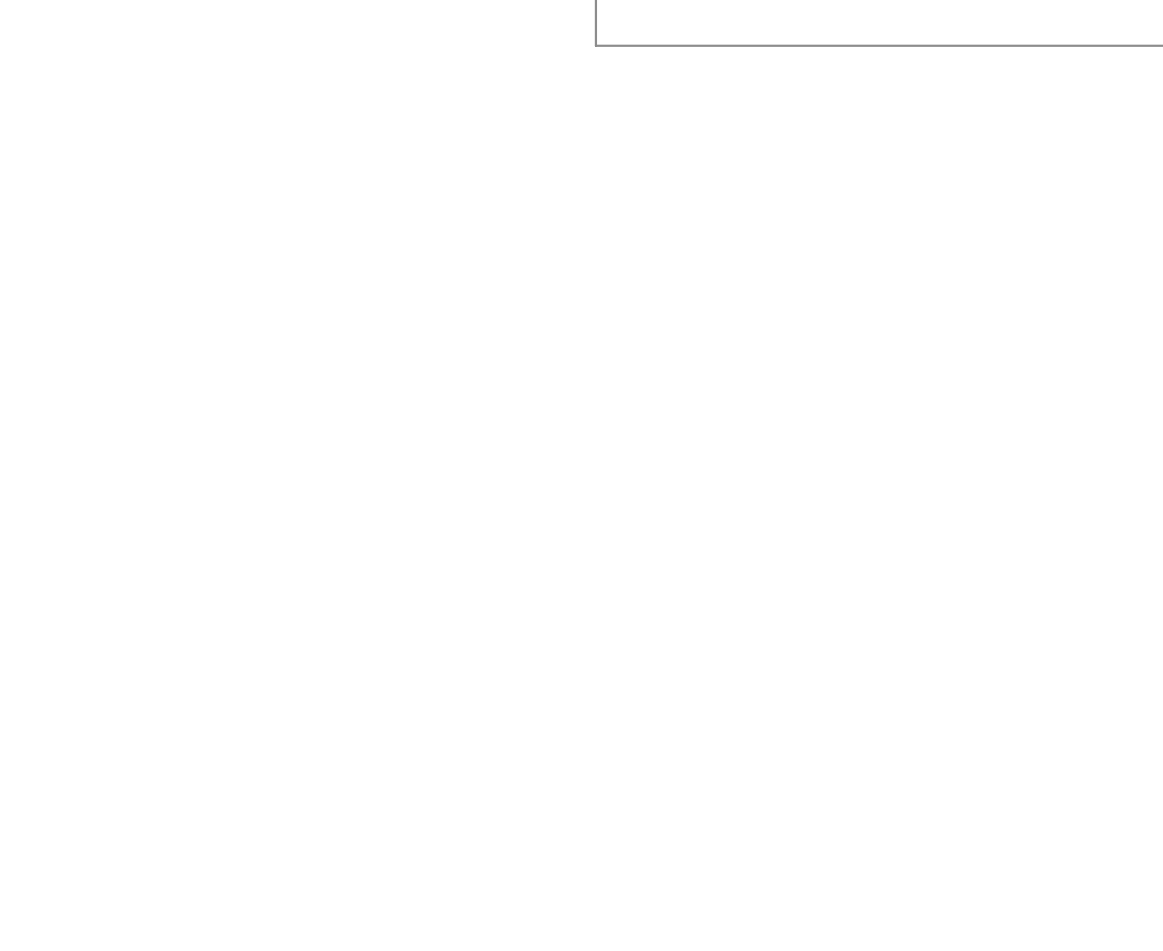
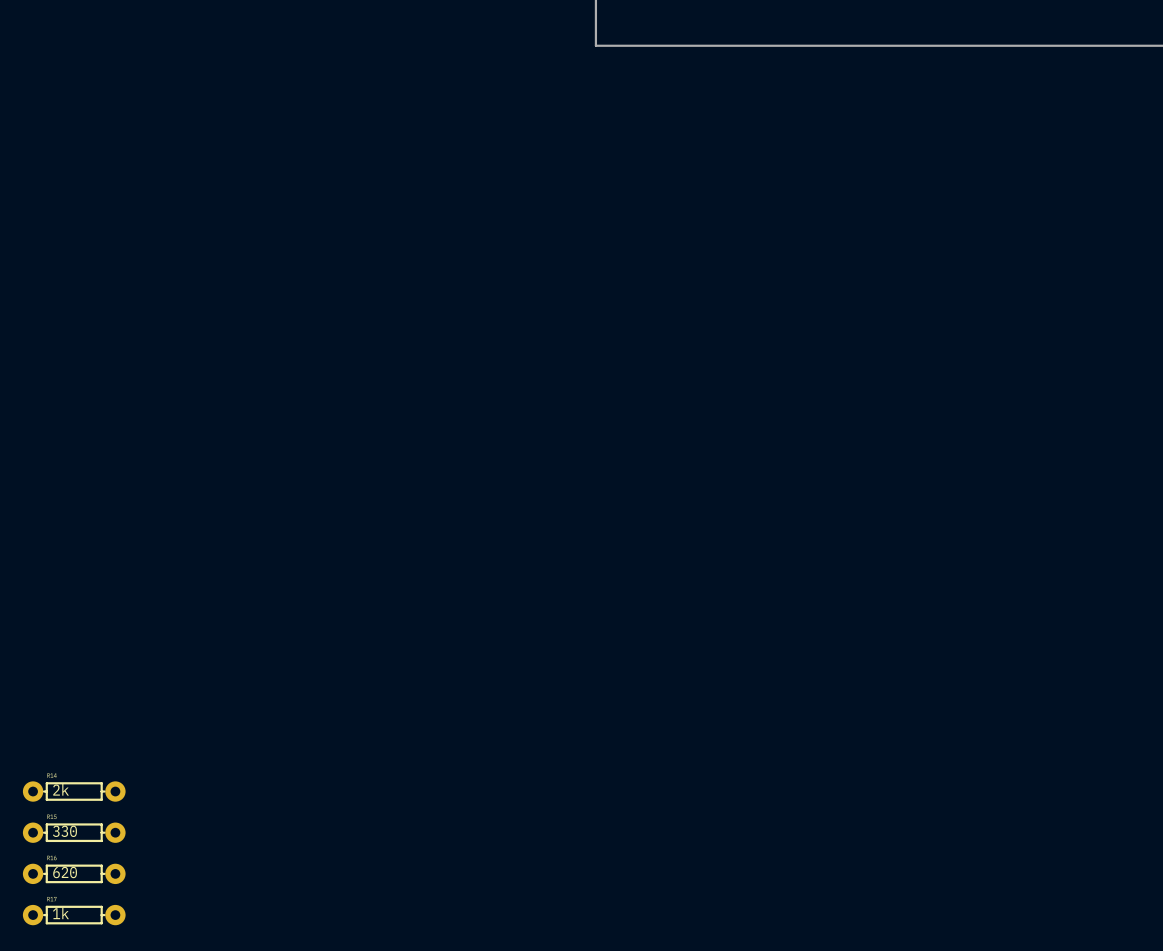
part: none -> 2k (74, 791)
part: none -> 330 (74, 832)
part: none -> 620 (74, 873)
part: none -> 1k (74, 915)

